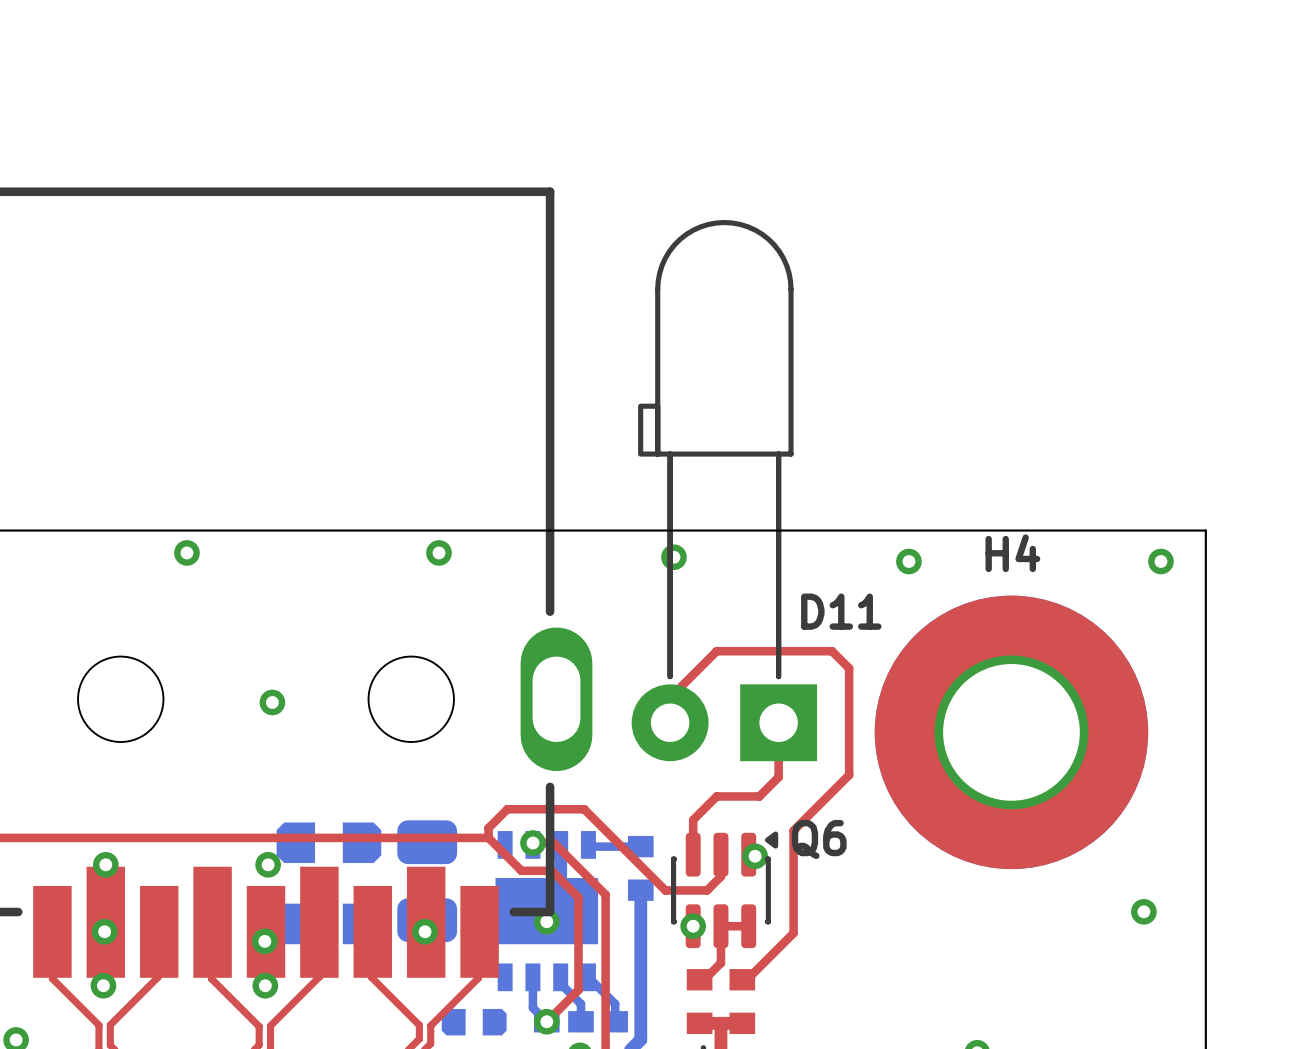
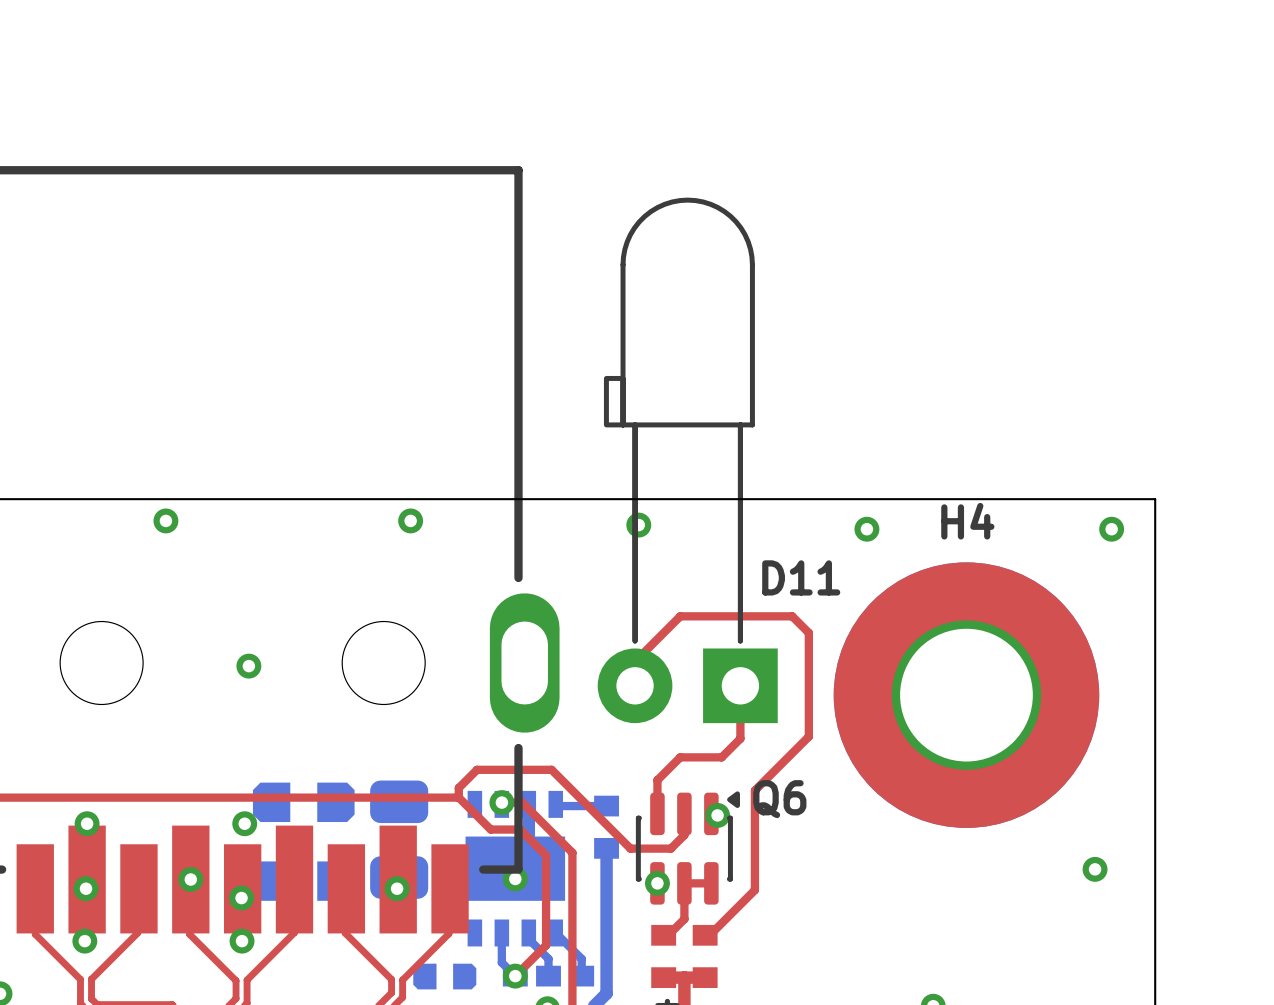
via: none -> (190, 879)

